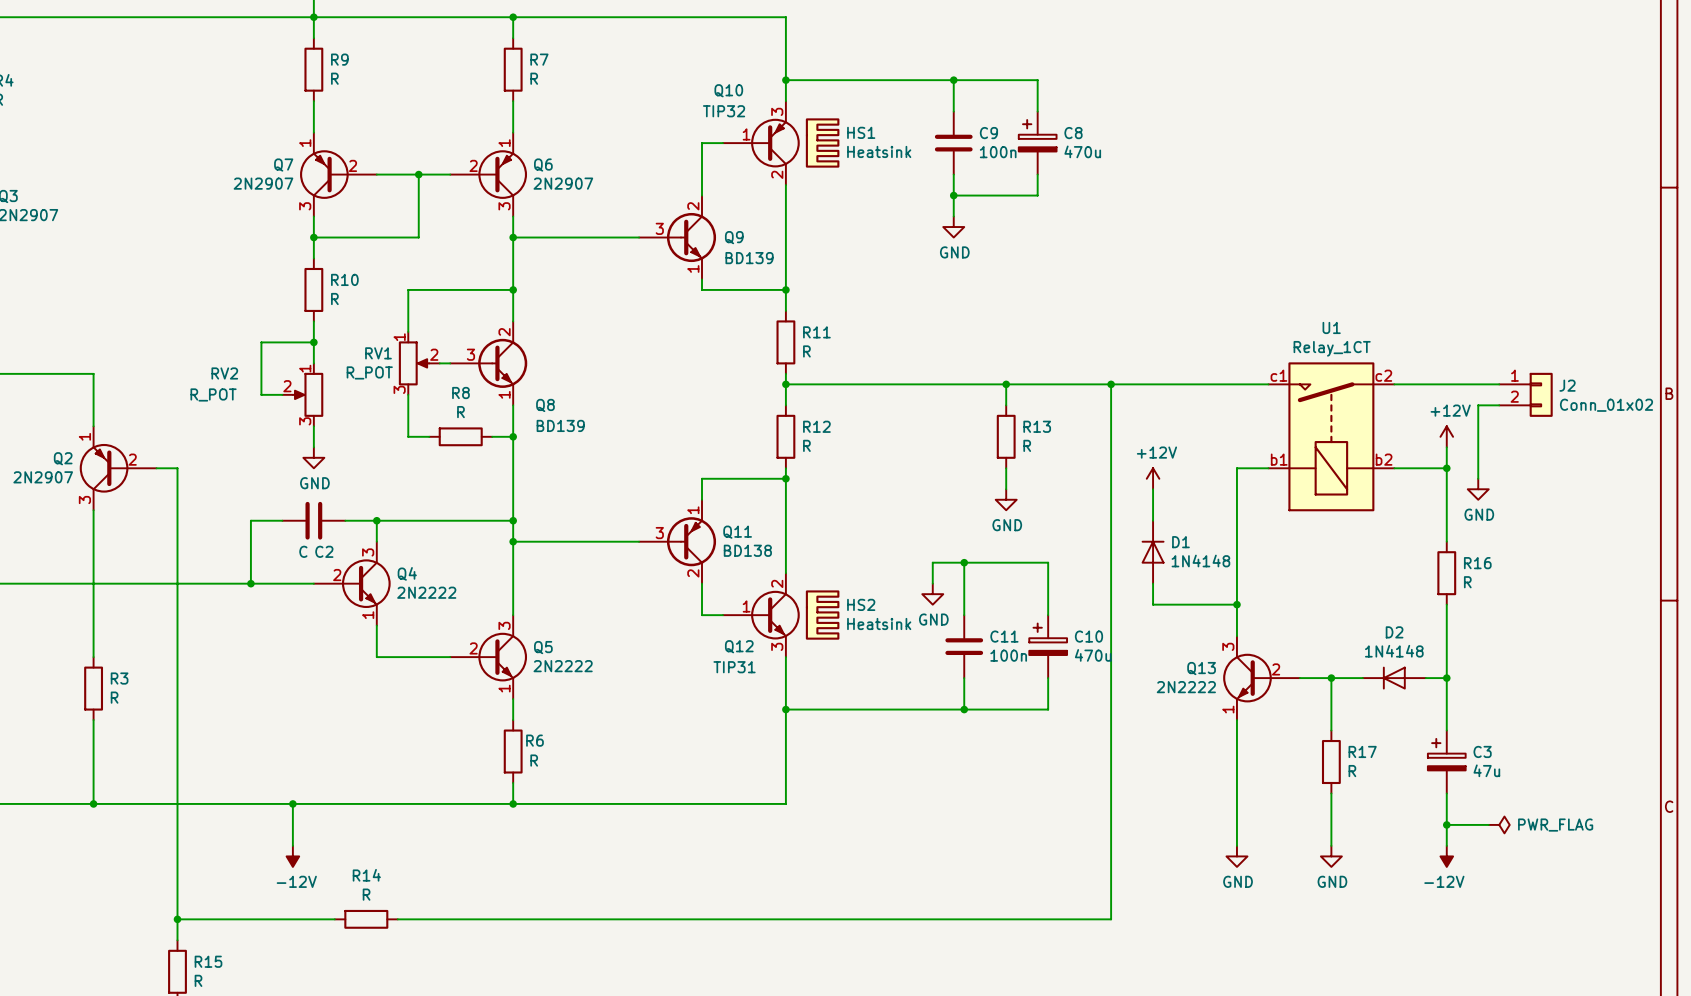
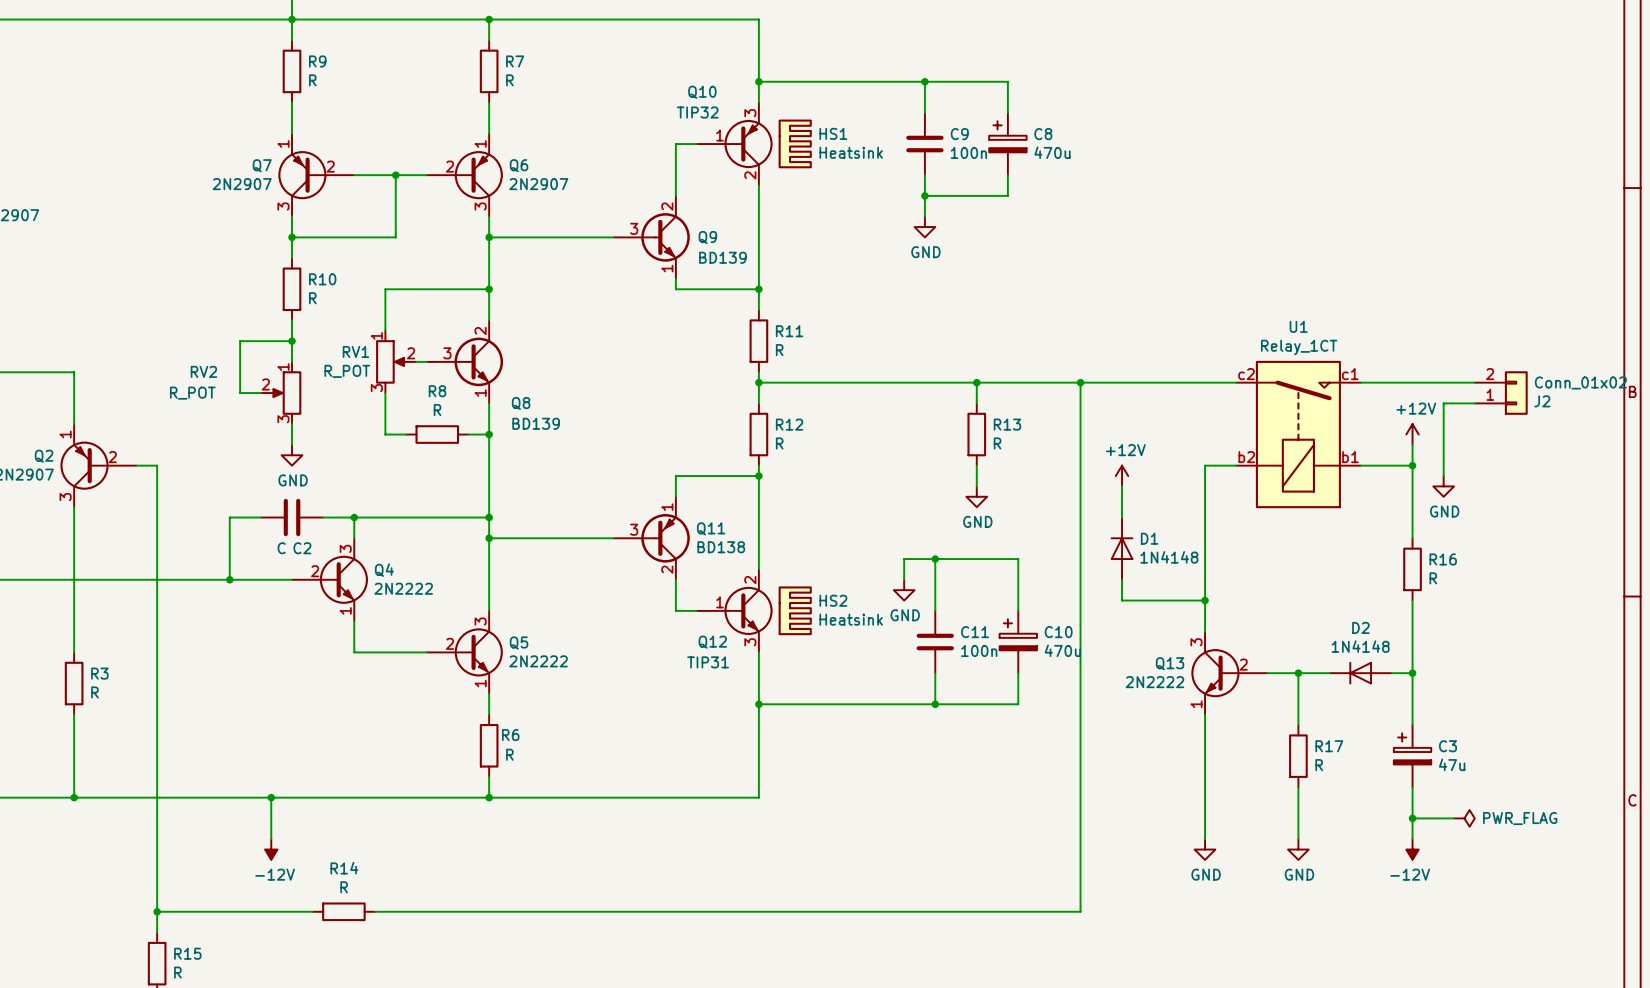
J2 flip: as is (1541, 394) -> up-down (1516, 393)
U1 flip: as is (1331, 436) -> left-right (1298, 434)

